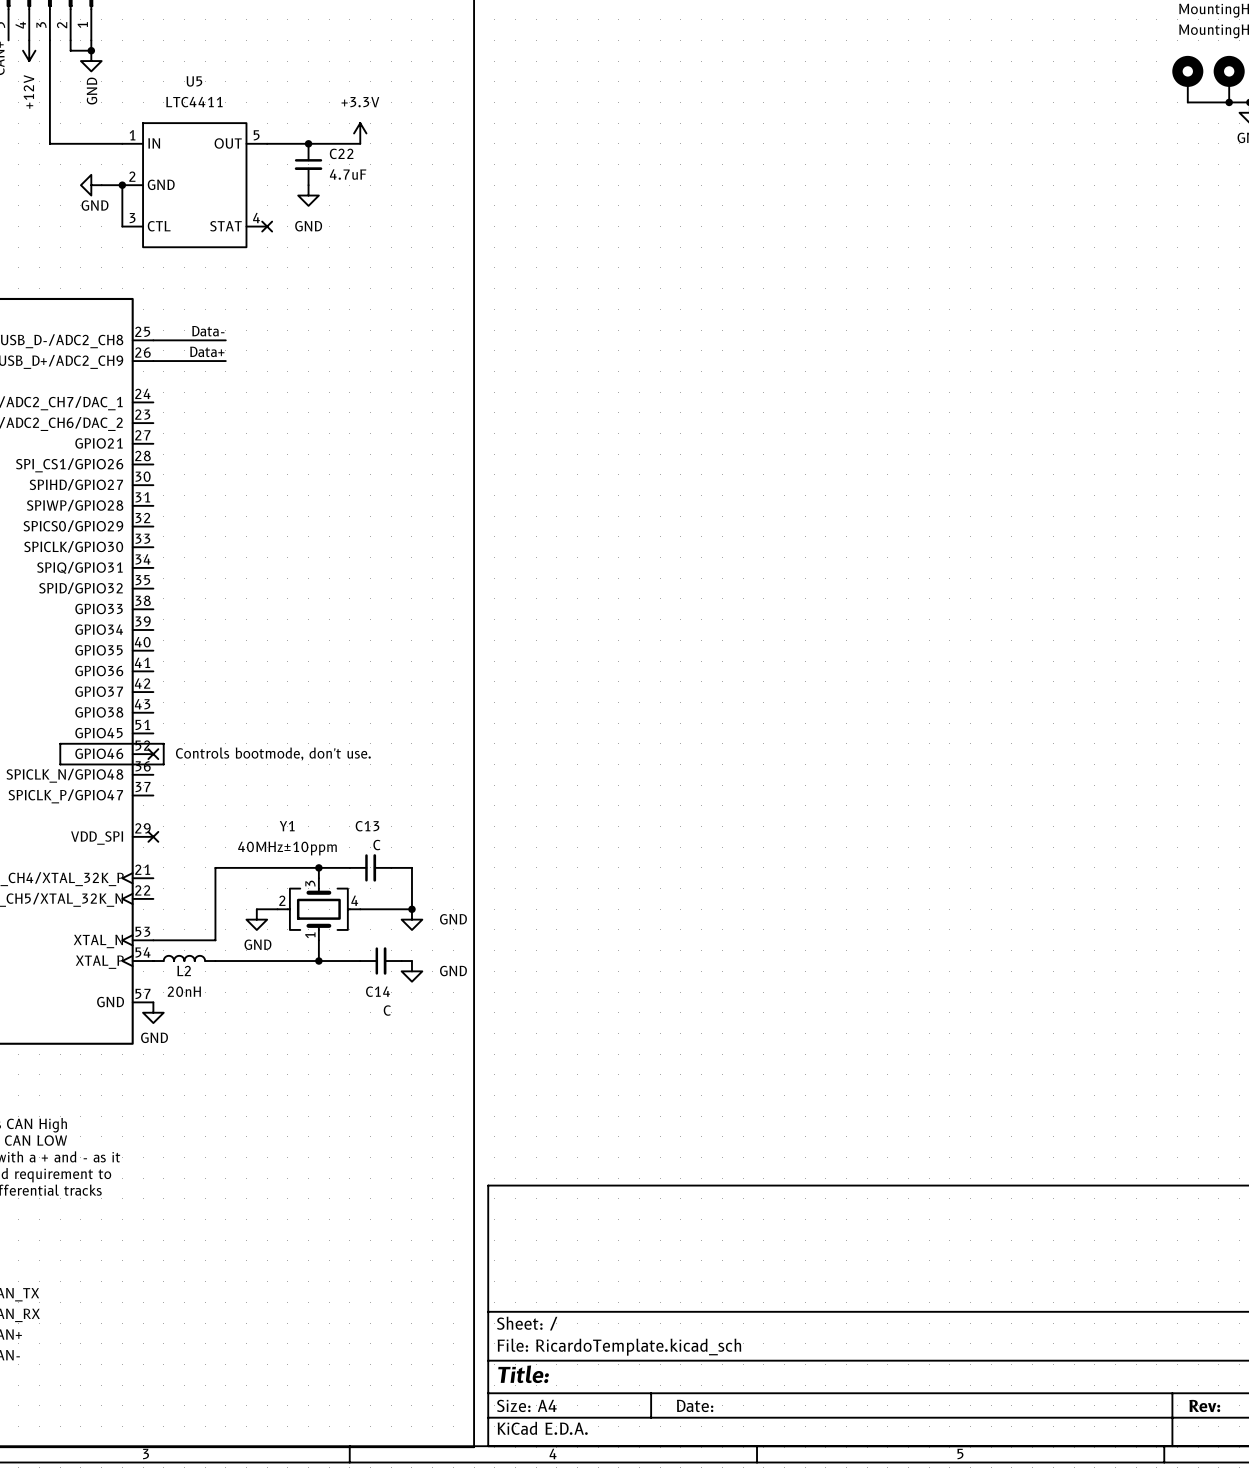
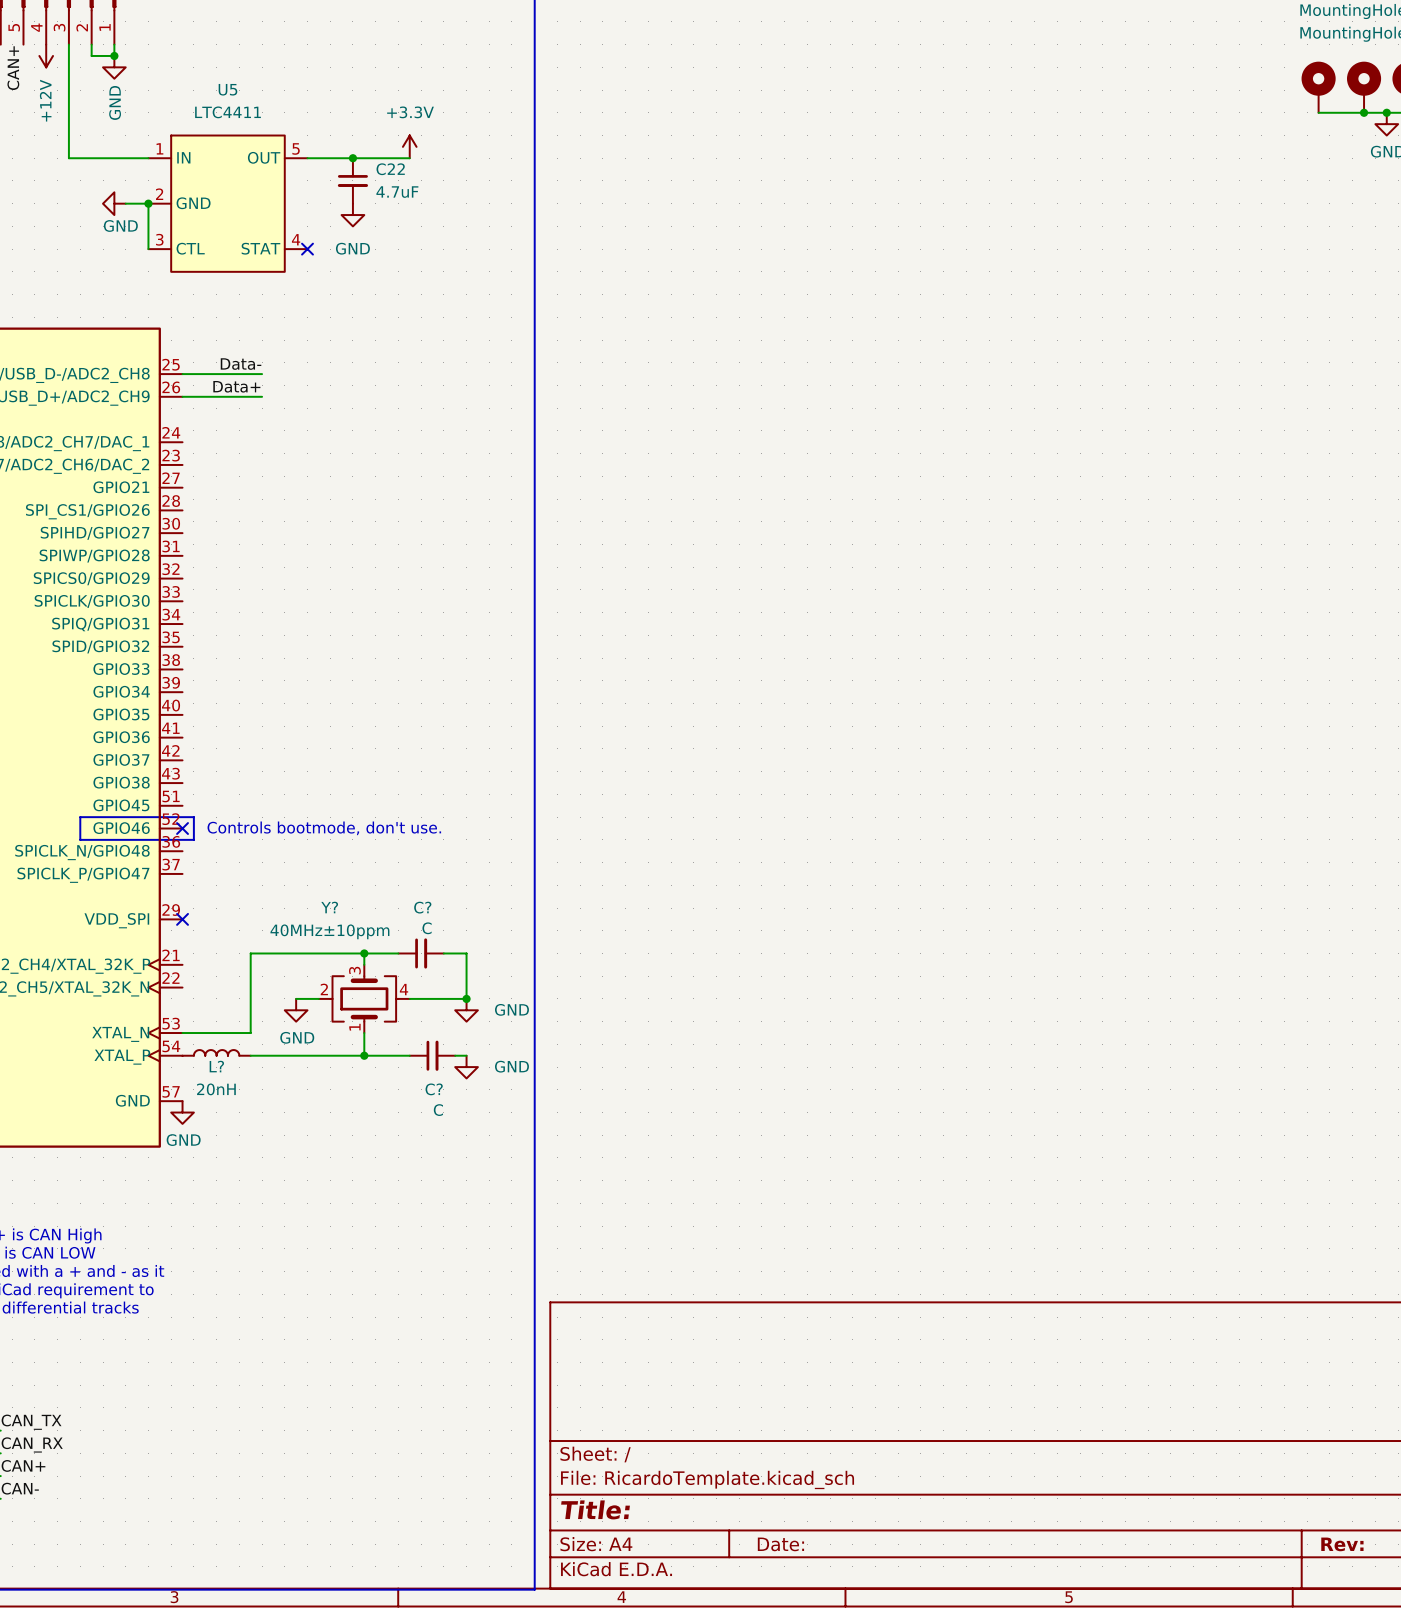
Y1 name: Y1 (287, 826) -> Y? (329, 907)
C13 name: C13 (367, 826) -> C? (422, 907)
L2 name: L2 (184, 970) -> L? (216, 1066)
C14 name: C14 (377, 991) -> C? (434, 1089)

